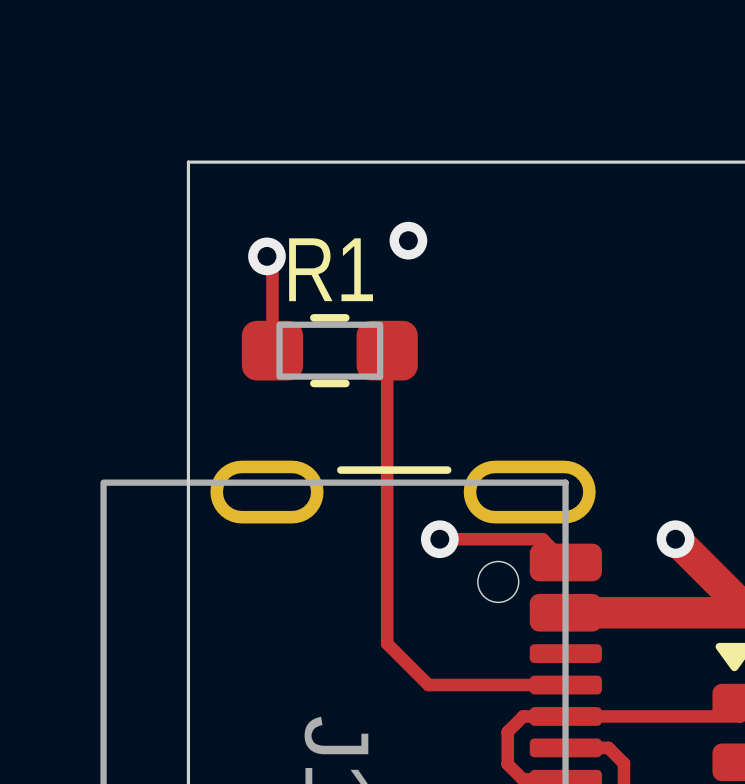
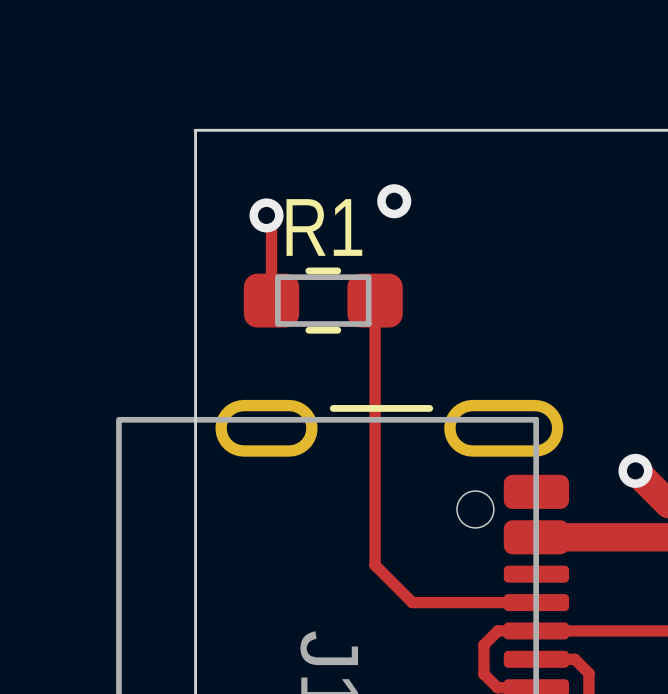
track: (439, 539) (542, 539) (565, 562) -> none
via: (439, 539) -> none

